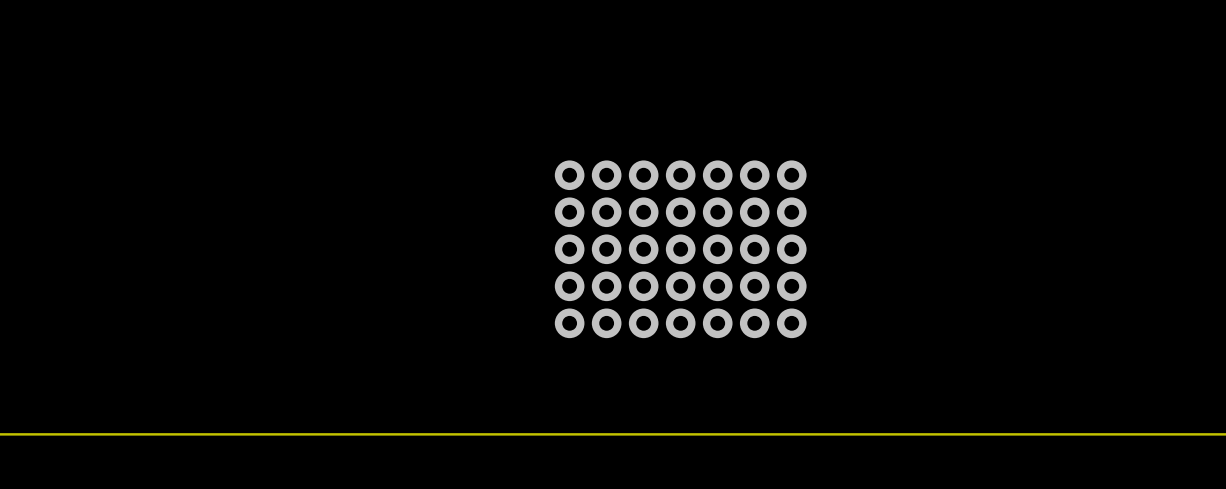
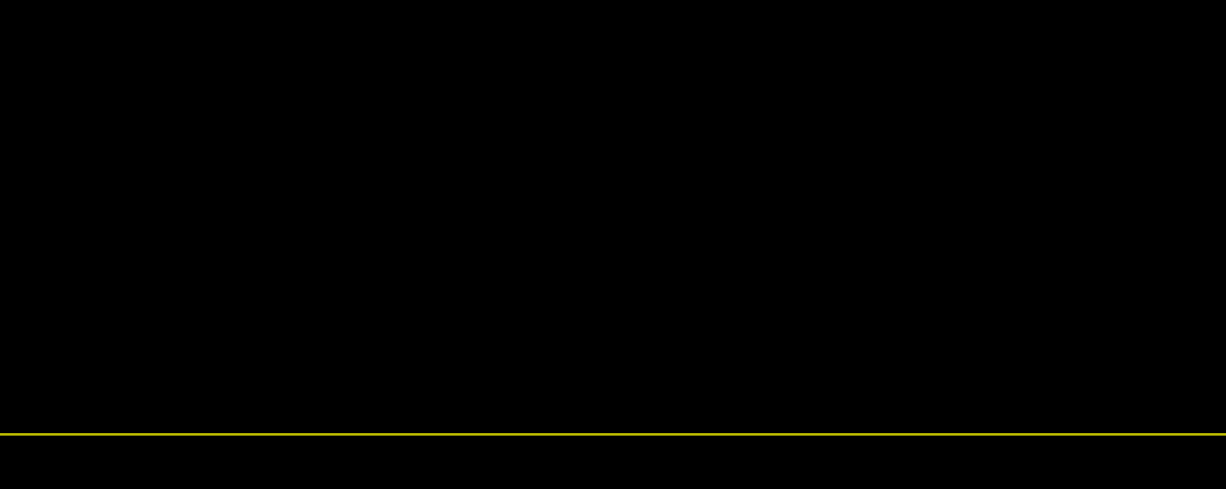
via: (569, 175) -> none
via: (606, 175) -> none
via: (643, 175) -> none
via: (680, 175) -> none
via: (717, 175) -> none
via: (754, 175) -> none
via: (791, 175) -> none
via: (569, 212) -> none
via: (606, 212) -> none
via: (643, 212) -> none
via: (680, 212) -> none
via: (717, 212) -> none
via: (754, 212) -> none
via: (791, 212) -> none
via: (569, 249) -> none
via: (606, 249) -> none
via: (643, 249) -> none
via: (680, 249) -> none
via: (717, 249) -> none
via: (754, 249) -> none
via: (791, 249) -> none
via: (569, 286) -> none
via: (606, 286) -> none
via: (643, 286) -> none
via: (680, 286) -> none
via: (717, 286) -> none
via: (754, 286) -> none
via: (791, 286) -> none
via: (569, 323) -> none
via: (606, 323) -> none
via: (643, 323) -> none
via: (680, 323) -> none
via: (717, 323) -> none
via: (754, 323) -> none
via: (791, 323) -> none

